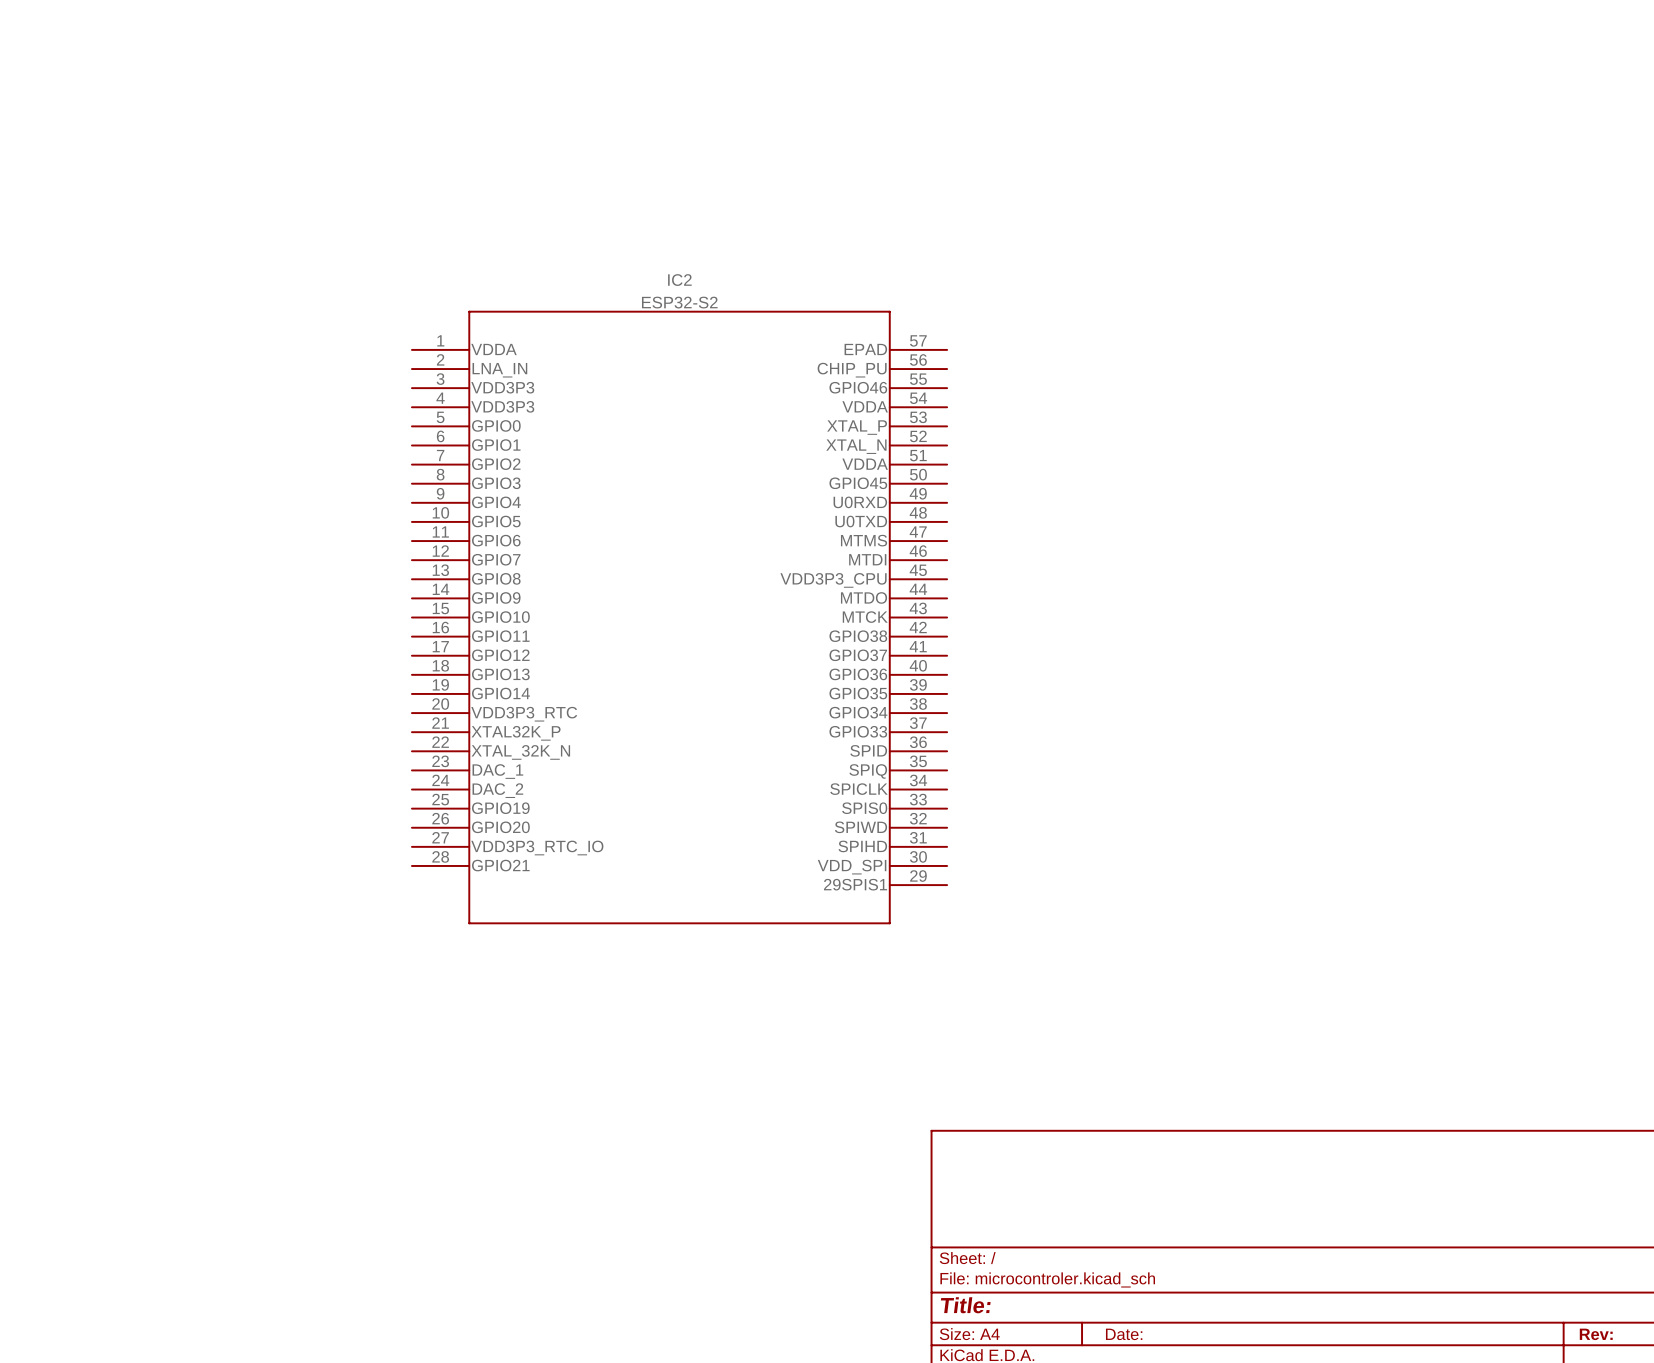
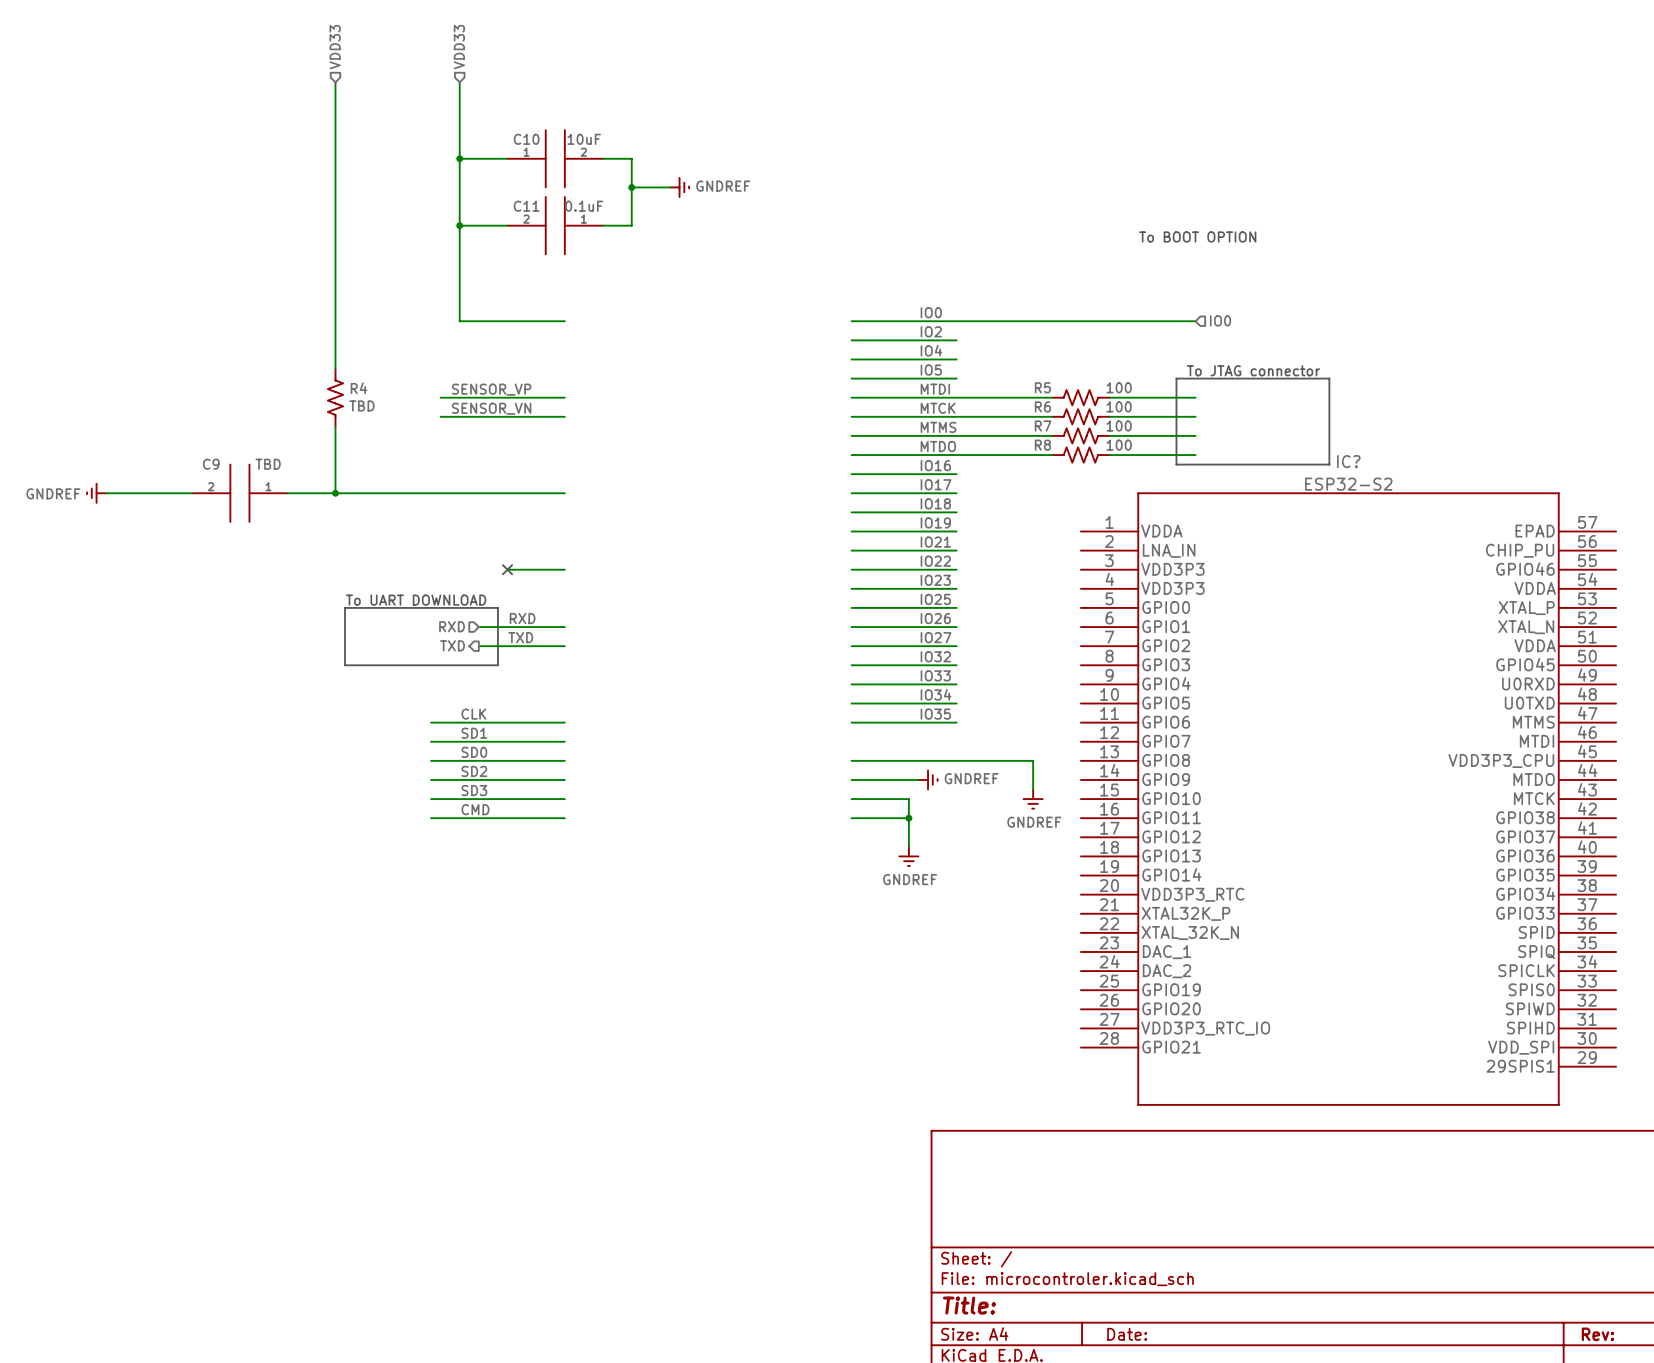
hierarchical label: none -> VDD33 (335, 47)
hierarchical label: none -> VDD33 (459, 47)
wire: none -> (335, 82) (335, 369)
wire: none -> (459, 82) (459, 321) (564, 321)
wire: none -> (459, 158) (507, 158)
junction: none -> (459, 158)
C10: none -> 10uF (555, 158)
wire: none -> (603, 158) (631, 158) (631, 225) (603, 225)
wire: none -> (631, 187) (669, 187)
junction: none -> (631, 187)
power symbol: none -> GNDREF (679, 187)
wire: none -> (459, 225) (507, 225)
junction: none -> (459, 225)
C11: none -> 0.1uF (555, 225)
text: none -> To BOOT OPTION (1197, 236)
label: none -> IO0 (931, 312)
hierarchical label: none -> IO0 (1220, 320)
wire: none -> (851, 321) (1195, 321)
label: none -> IO2 (931, 331)
wire: none -> (851, 340) (956, 340)
label: none -> IO4 (931, 350)
wire: none -> (851, 359) (956, 359)
label: none -> IO5 (931, 370)
text: none -> To JTAG connector (1253, 370)
wire: none -> (851, 378) (956, 378)
line: none -> (1176, 378) (1329, 378) (1329, 464) (1176, 464) (1176, 378)
label: none -> MTDI (935, 389)
label: none -> SENSOR_VP (491, 389)
R4: none -> TBD (335, 397)
wire: none -> (440, 397) (564, 397)
wire: none -> (851, 397) (1052, 397)
R5: none -> 100 (1080, 397)
wire: none -> (1109, 397) (1195, 397)
label: none -> MTCK (938, 408)
label: none -> SENSOR_VN (491, 408)
wire: none -> (440, 416) (564, 416)
wire: none -> (851, 416) (1052, 416)
R6: none -> 100 (1080, 416)
wire: none -> (1109, 416) (1195, 416)
wire: none -> (335, 426) (335, 493)
label: none -> MTMS (938, 427)
wire: none -> (851, 435) (1052, 435)
R7: none -> 100 (1080, 435)
wire: none -> (1109, 435) (1195, 435)
label: none -> MTDO (938, 446)
wire: none -> (851, 455) (1052, 455)
R8: none -> 100 (1080, 455)
wire: none -> (1109, 455) (1195, 455)
label: none -> IO16 (935, 465)
wire: none -> (851, 474) (956, 474)
label: none -> IO17 (936, 484)
power symbol: none -> GNDREF (96, 493)
wire: none -> (106, 493) (192, 493)
C9: none -> TBD (239, 493)
wire: none -> (287, 493) (564, 493)
junction: none -> (335, 493)
wire: none -> (851, 493) (956, 493)
label: none -> IO18 (935, 503)
wire: none -> (851, 512) (956, 512)
label: none -> IO19 (935, 522)
wire: none -> (851, 531) (956, 531)
label: none -> IO21 (935, 542)
wire: none -> (851, 550) (956, 550)
label: none -> IO22 (935, 561)
wire: none -> (507, 569) (564, 569)
no-connect mark: none -> (507, 569)
wire: none -> (851, 569) (956, 569)
label: none -> IO23 (935, 580)
wire: none -> (851, 588) (956, 588)
label: none -> IO25 (935, 599)
text: none -> To UART DOWNLOAD (416, 600)
line: none -> (345, 607) (497, 607) (497, 665) (345, 665) (345, 607)
wire: none -> (851, 607) (956, 607)
IC2: ESP32-S2 (679, 617) -> none
label: none -> RXD (522, 618)
label: none -> IO26 (935, 618)
hierarchical label: none -> RXD (452, 626)
wire: none -> (478, 627) (564, 627)
wire: none -> (851, 627) (956, 627)
label: none -> TXD (520, 637)
label: none -> IO27 (936, 637)
hierarchical label: none -> TXD (452, 645)
wire: none -> (478, 646) (564, 646)
wire: none -> (851, 646) (956, 646)
label: none -> IO32 (935, 656)
wire: none -> (851, 665) (956, 665)
label: none -> IO33 (935, 675)
wire: none -> (851, 684) (956, 684)
label: none -> IO34 (936, 694)
wire: none -> (851, 703) (956, 703)
label: none -> CLK (473, 714)
label: none -> IO35 (935, 714)
wire: none -> (431, 722) (564, 722)
wire: none -> (851, 722) (956, 722)
label: none -> SD1 (474, 733)
wire: none -> (431, 741) (564, 741)
label: none -> SD0 (474, 752)
wire: none -> (431, 760) (564, 760)
wire: none -> (851, 760) (1033, 760) (1033, 789)
label: none -> SD2 (474, 771)
wire: none -> (431, 779) (564, 779)
wire: none -> (851, 779) (918, 779)
power symbol: none -> GNDREF (928, 779)
label: none -> SD3 (474, 790)
wire: none -> (431, 799) (564, 799)
wire: none -> (851, 799) (908, 799) (908, 846)
power symbol: none -> GNDREF (1033, 799)
IC?: none -> ESP32-S2 (1348, 799)
label: none -> CMD (475, 809)
wire: none -> (431, 818) (564, 818)
wire: none -> (851, 818) (908, 818)
junction: none -> (908, 818)
power symbol: none -> GNDREF (908, 856)

